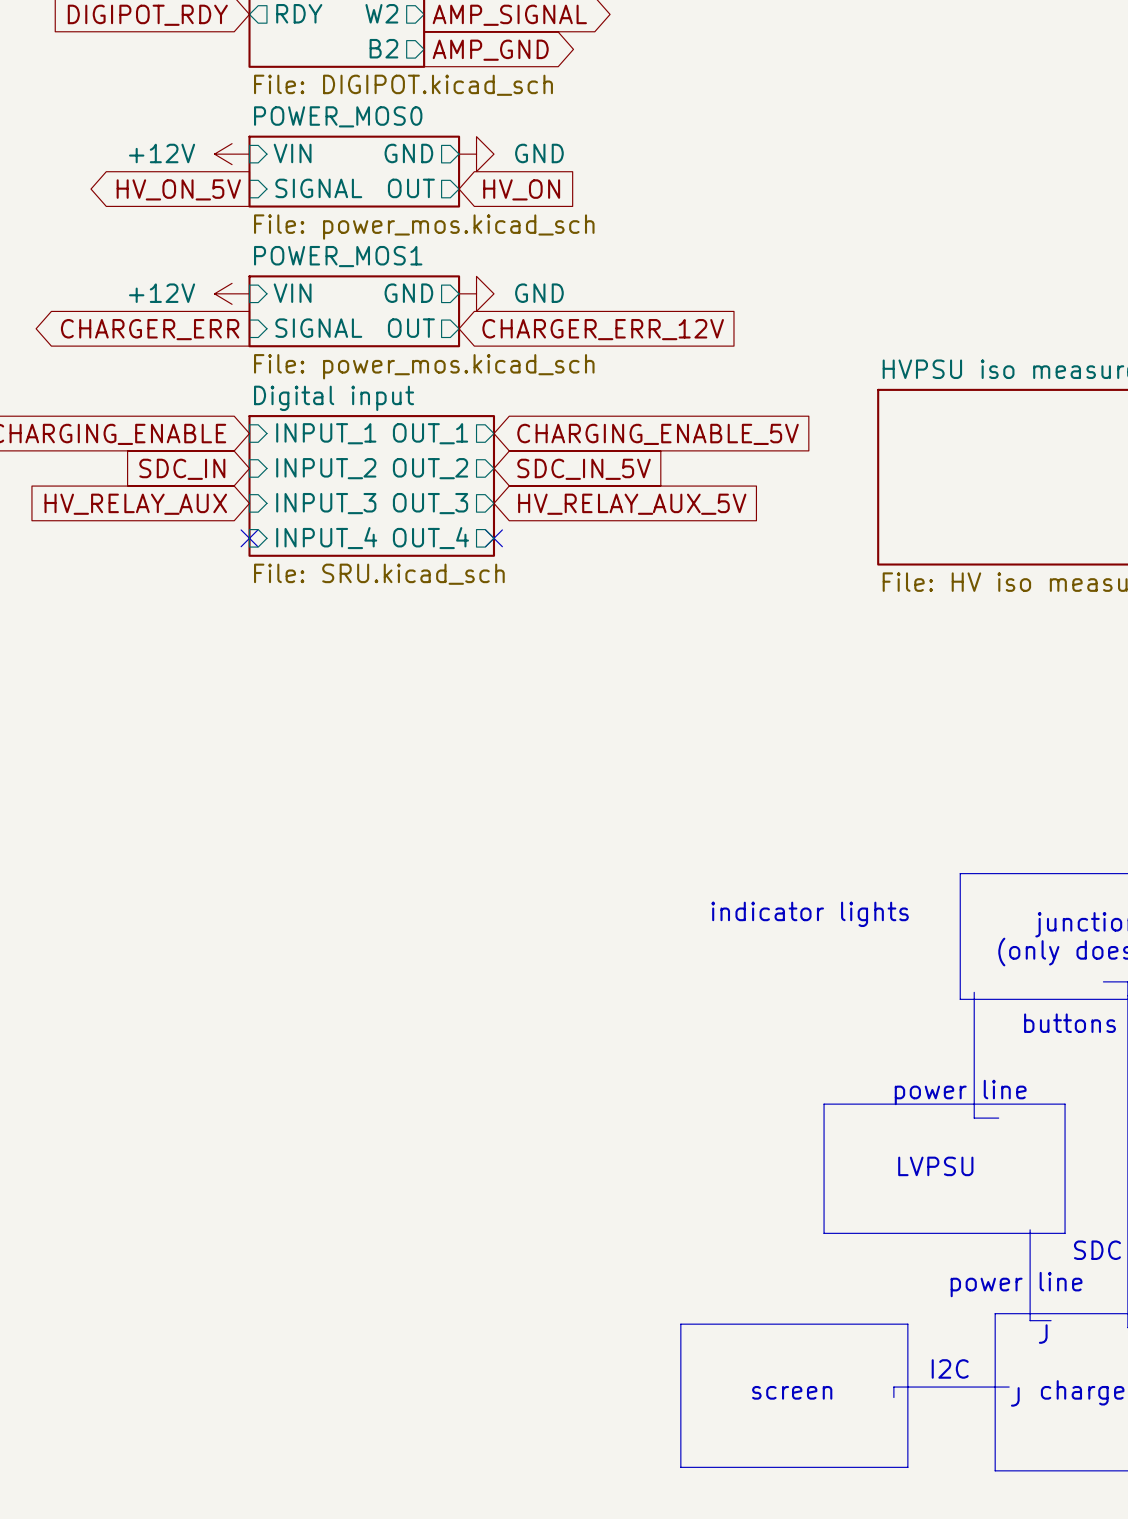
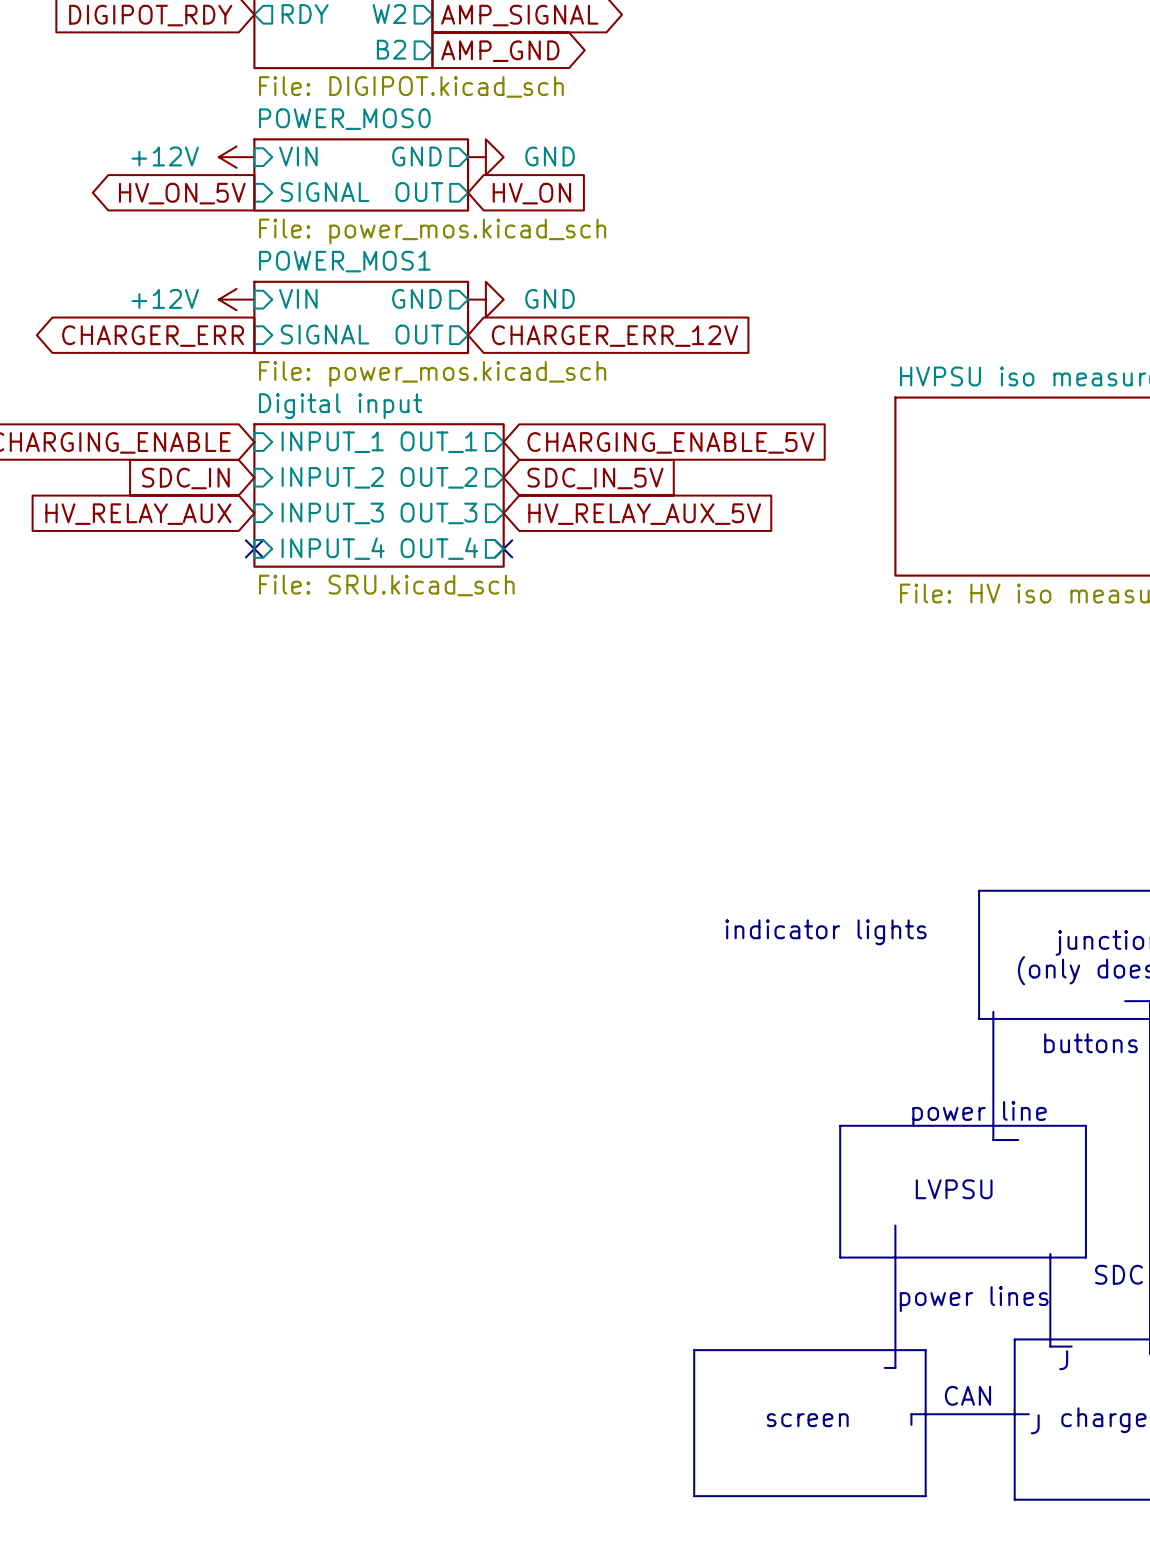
line: none -> (895, 1225) (895, 1367) (884, 1367)
text: power line (1016, 1284) -> power lines (974, 1299)
text: I2C (950, 1368) -> CAN (967, 1395)

